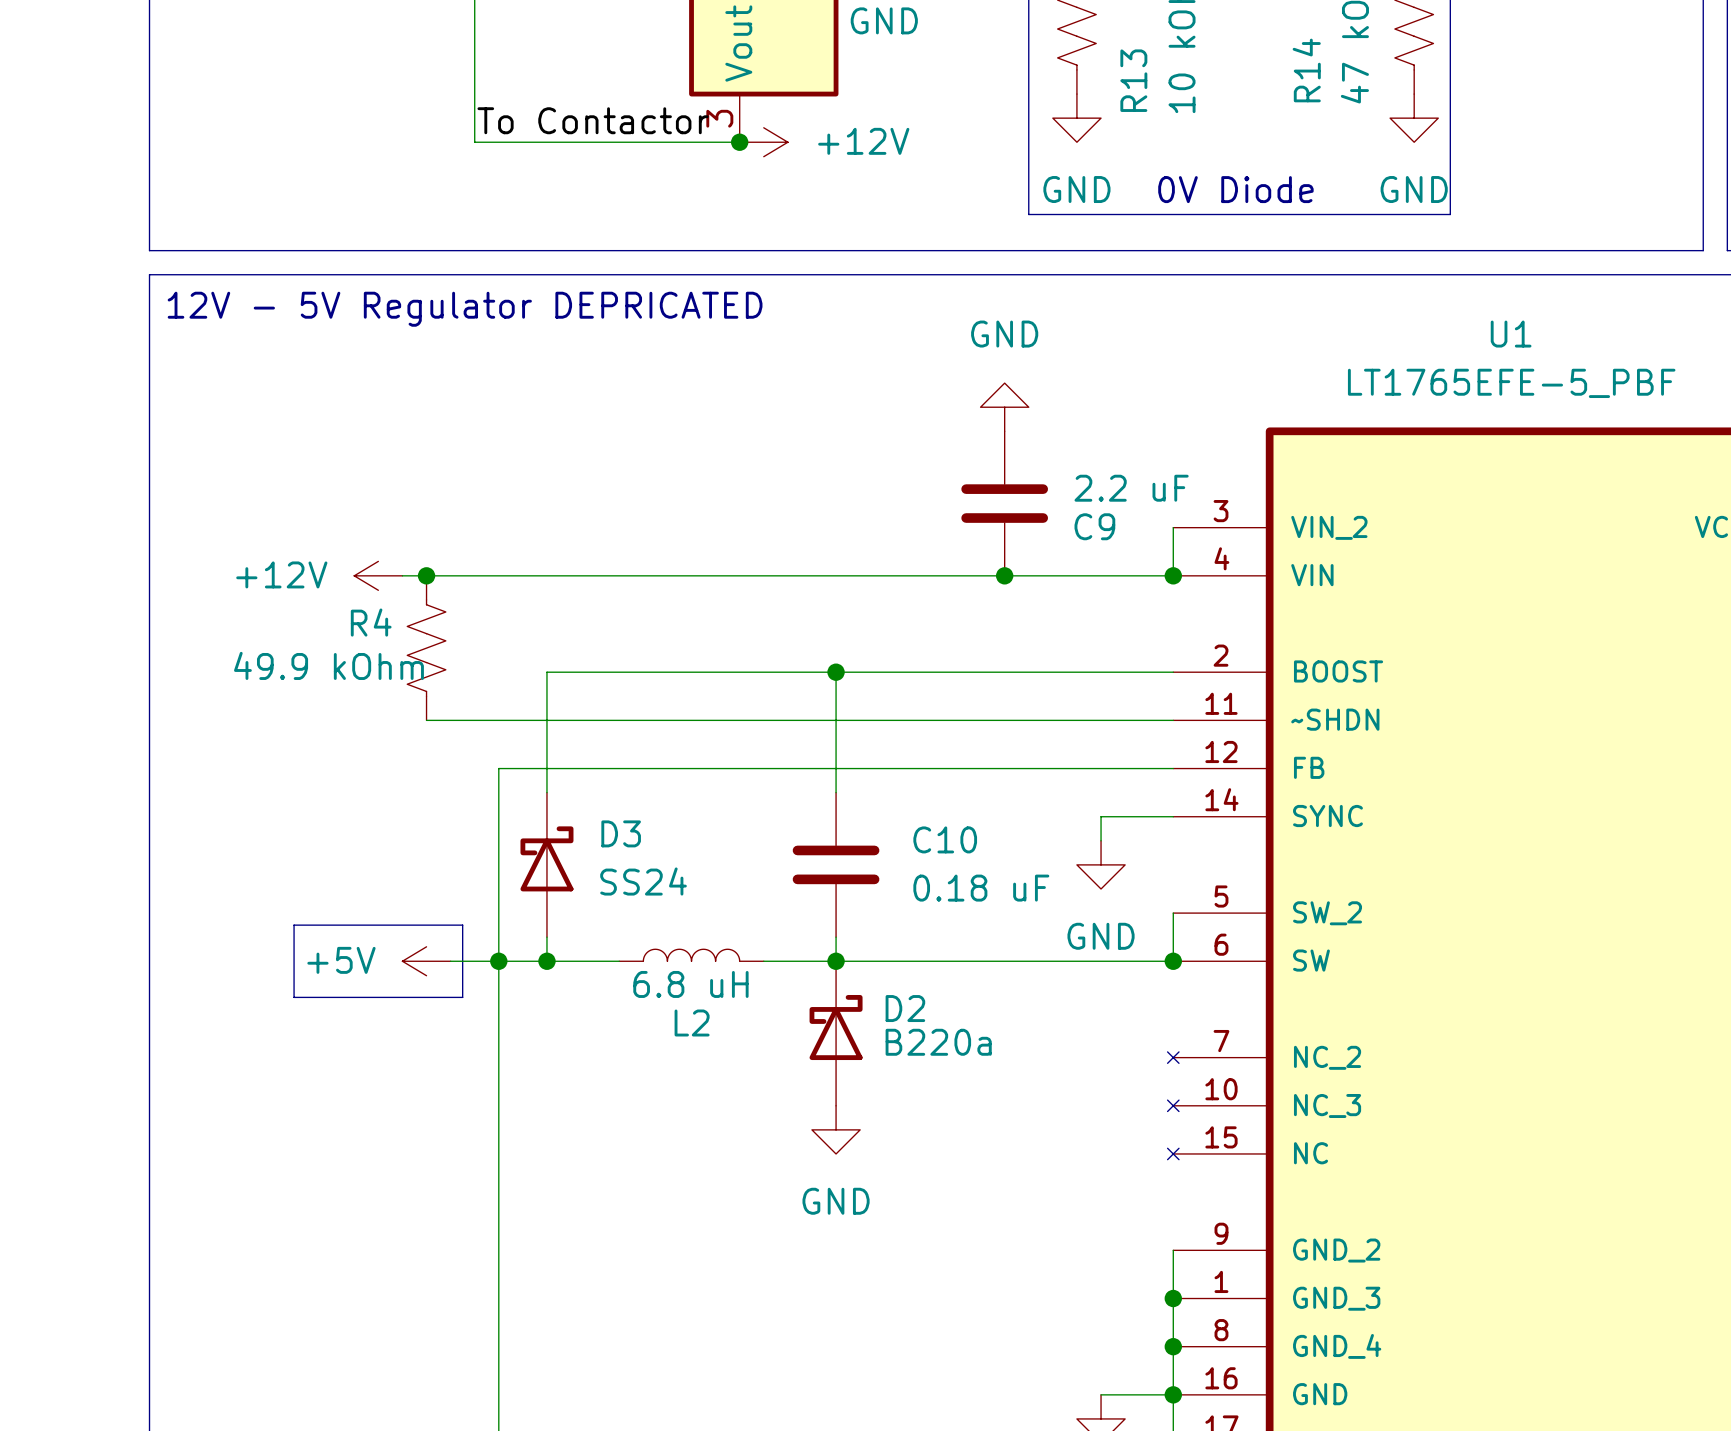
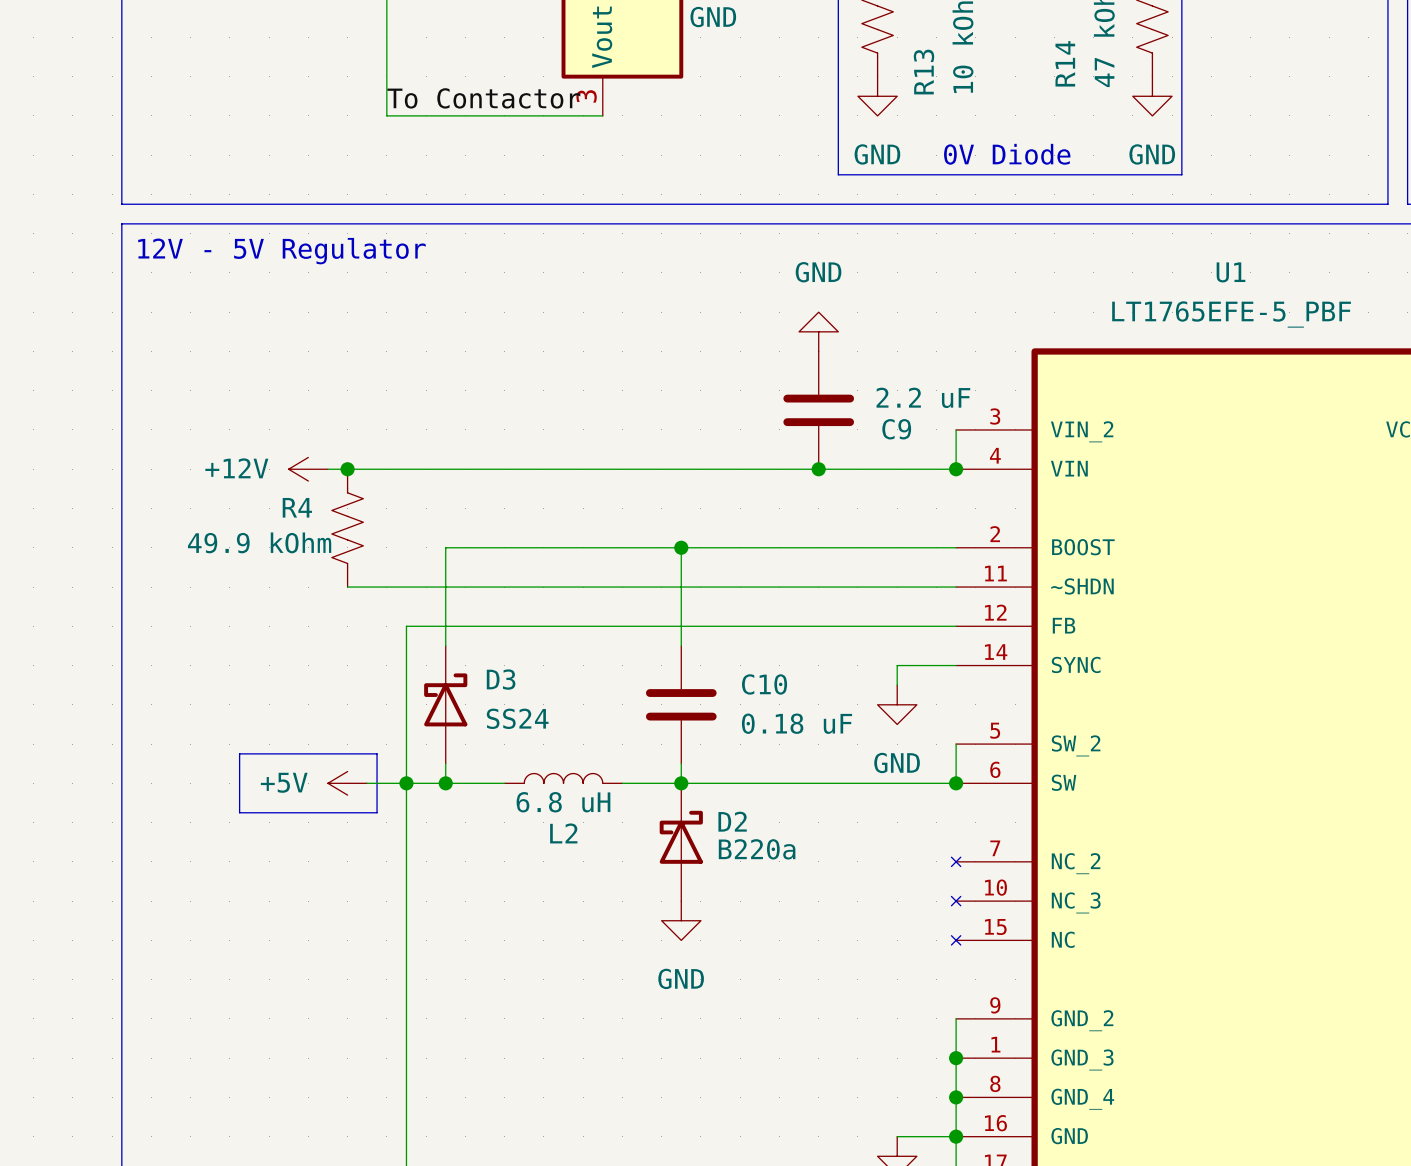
junction: (739, 142) -> none
power symbol: +12V (763, 142) -> none
text: 12V - 5V Regulator DEPRICATED (465, 309) -> 12V - 5V Regulator (281, 251)

